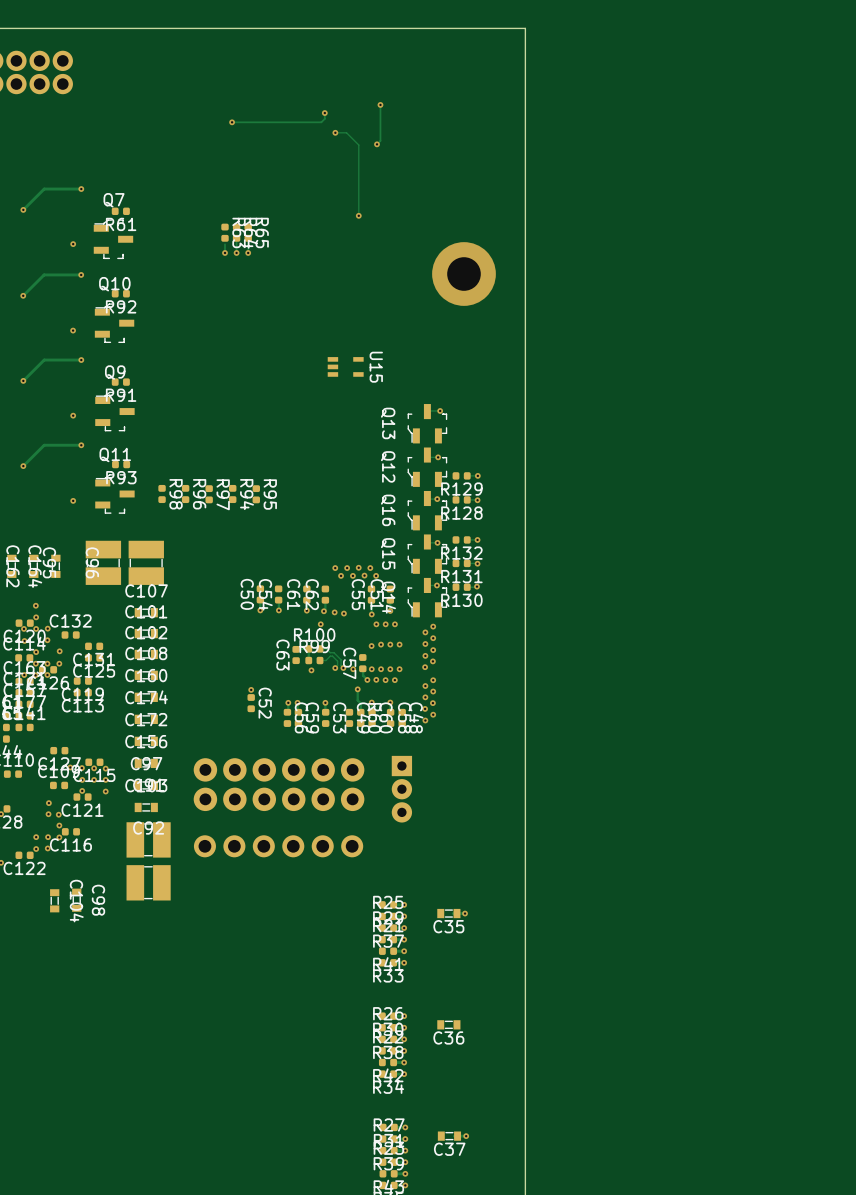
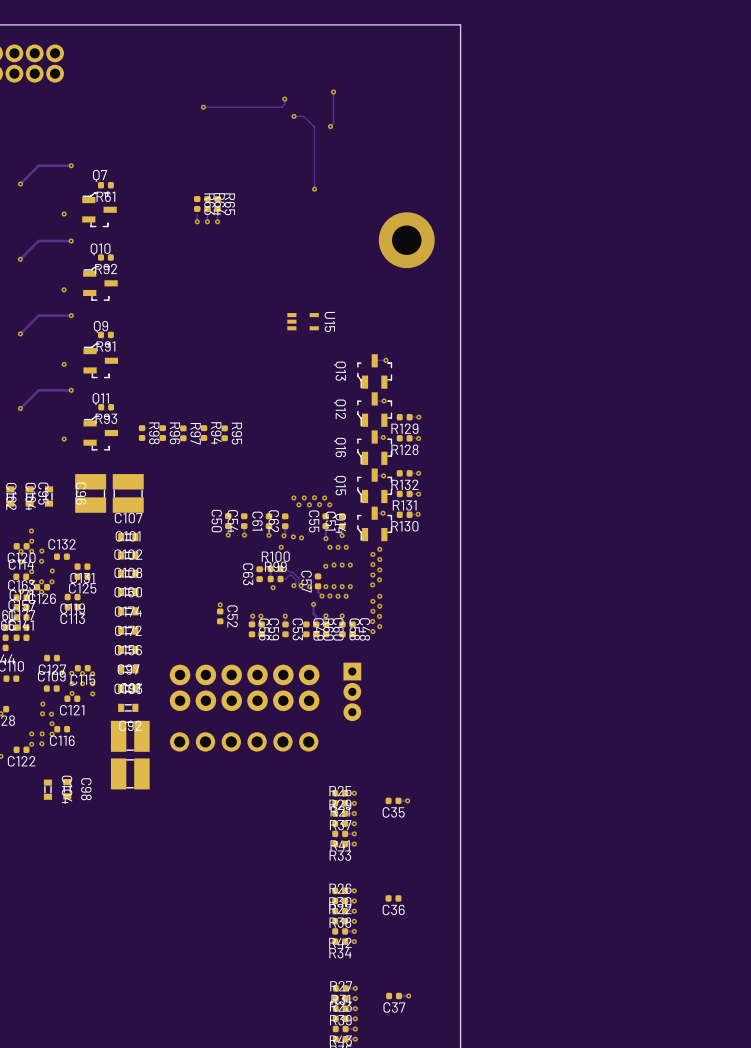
C35 footprint: [437, 908, 461, 919] -> [385, 797, 402, 805]
C36 footprint: [437, 1020, 461, 1030] -> [385, 895, 402, 902]
C37 footprint: [437, 1131, 462, 1141] -> [386, 992, 402, 1000]

